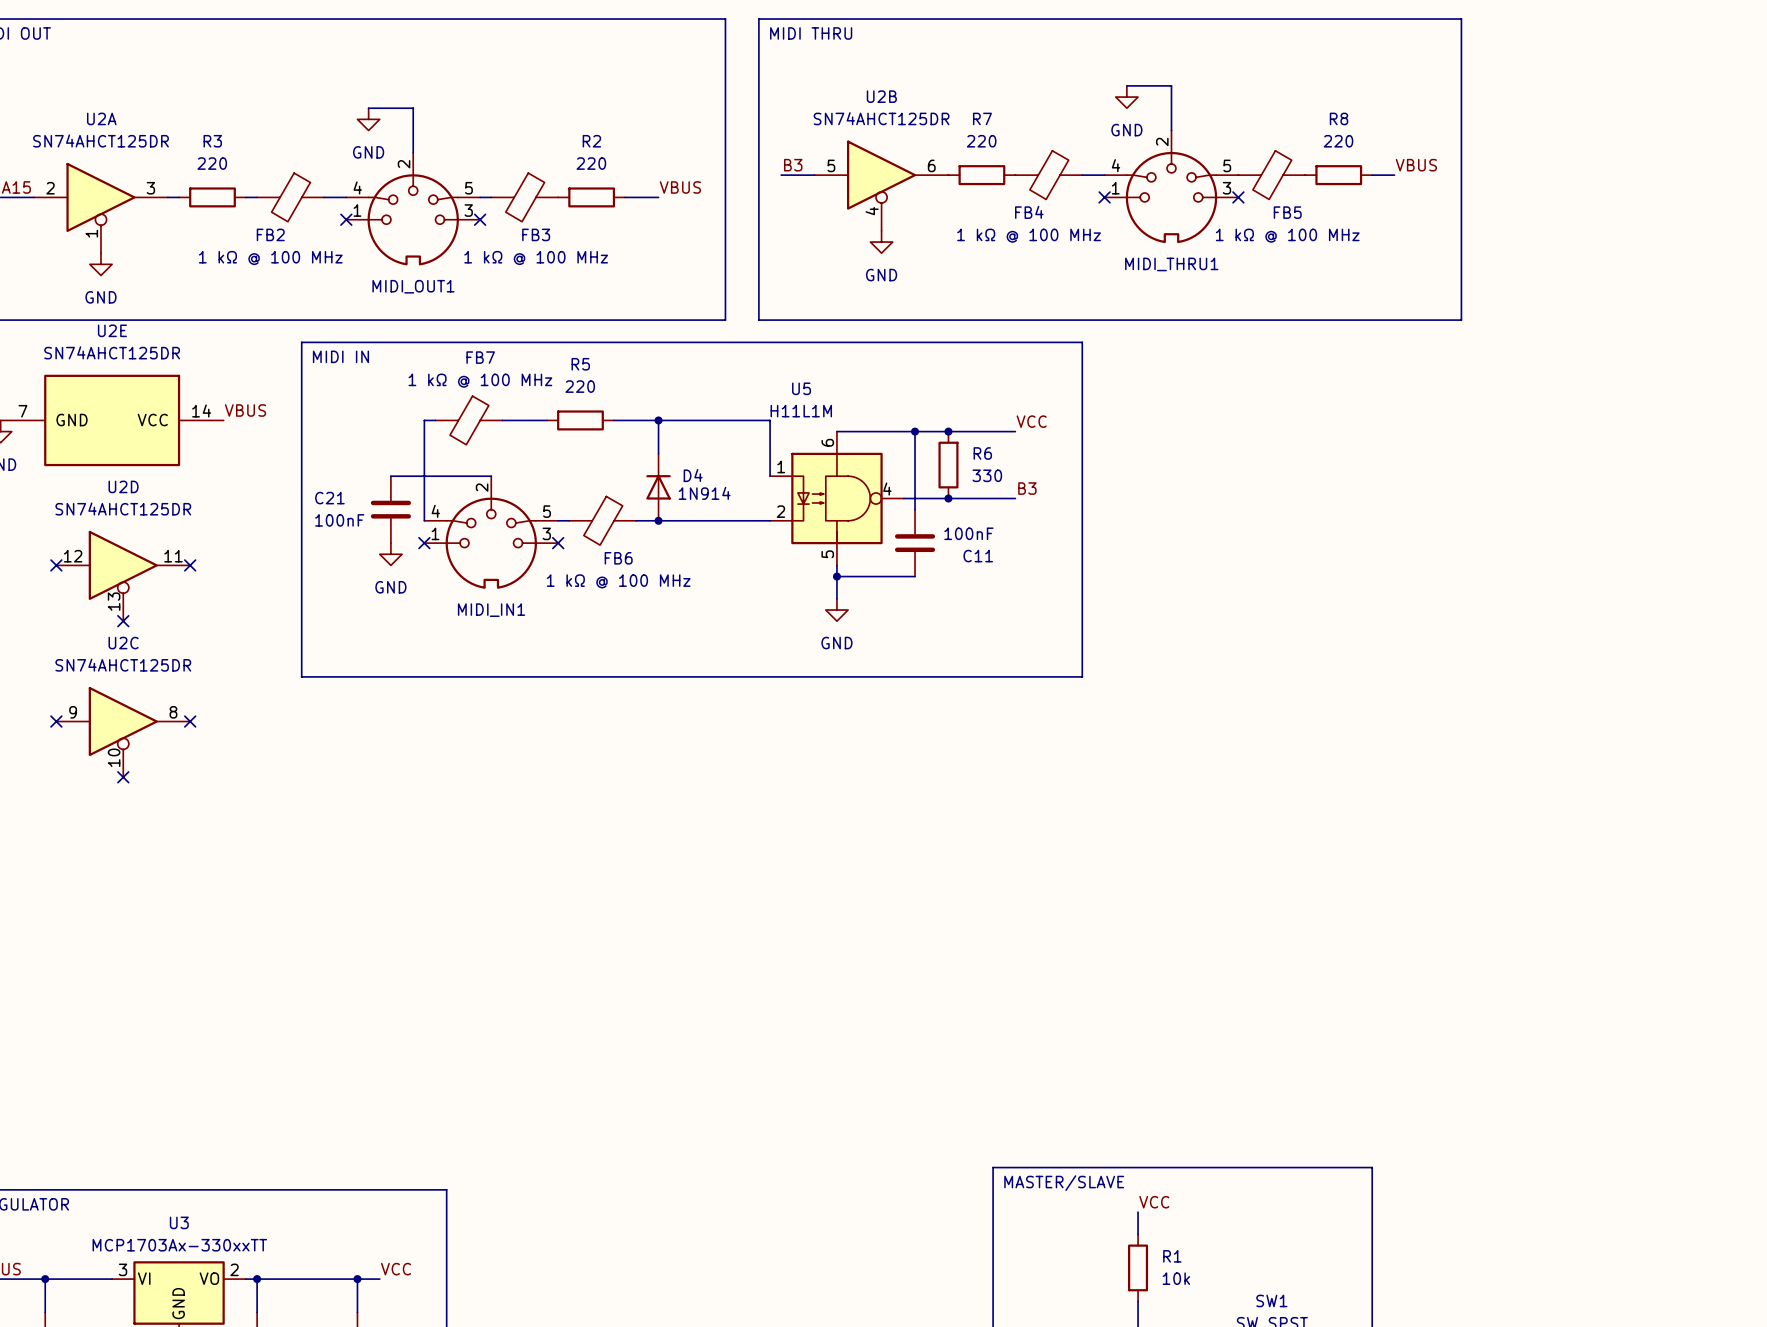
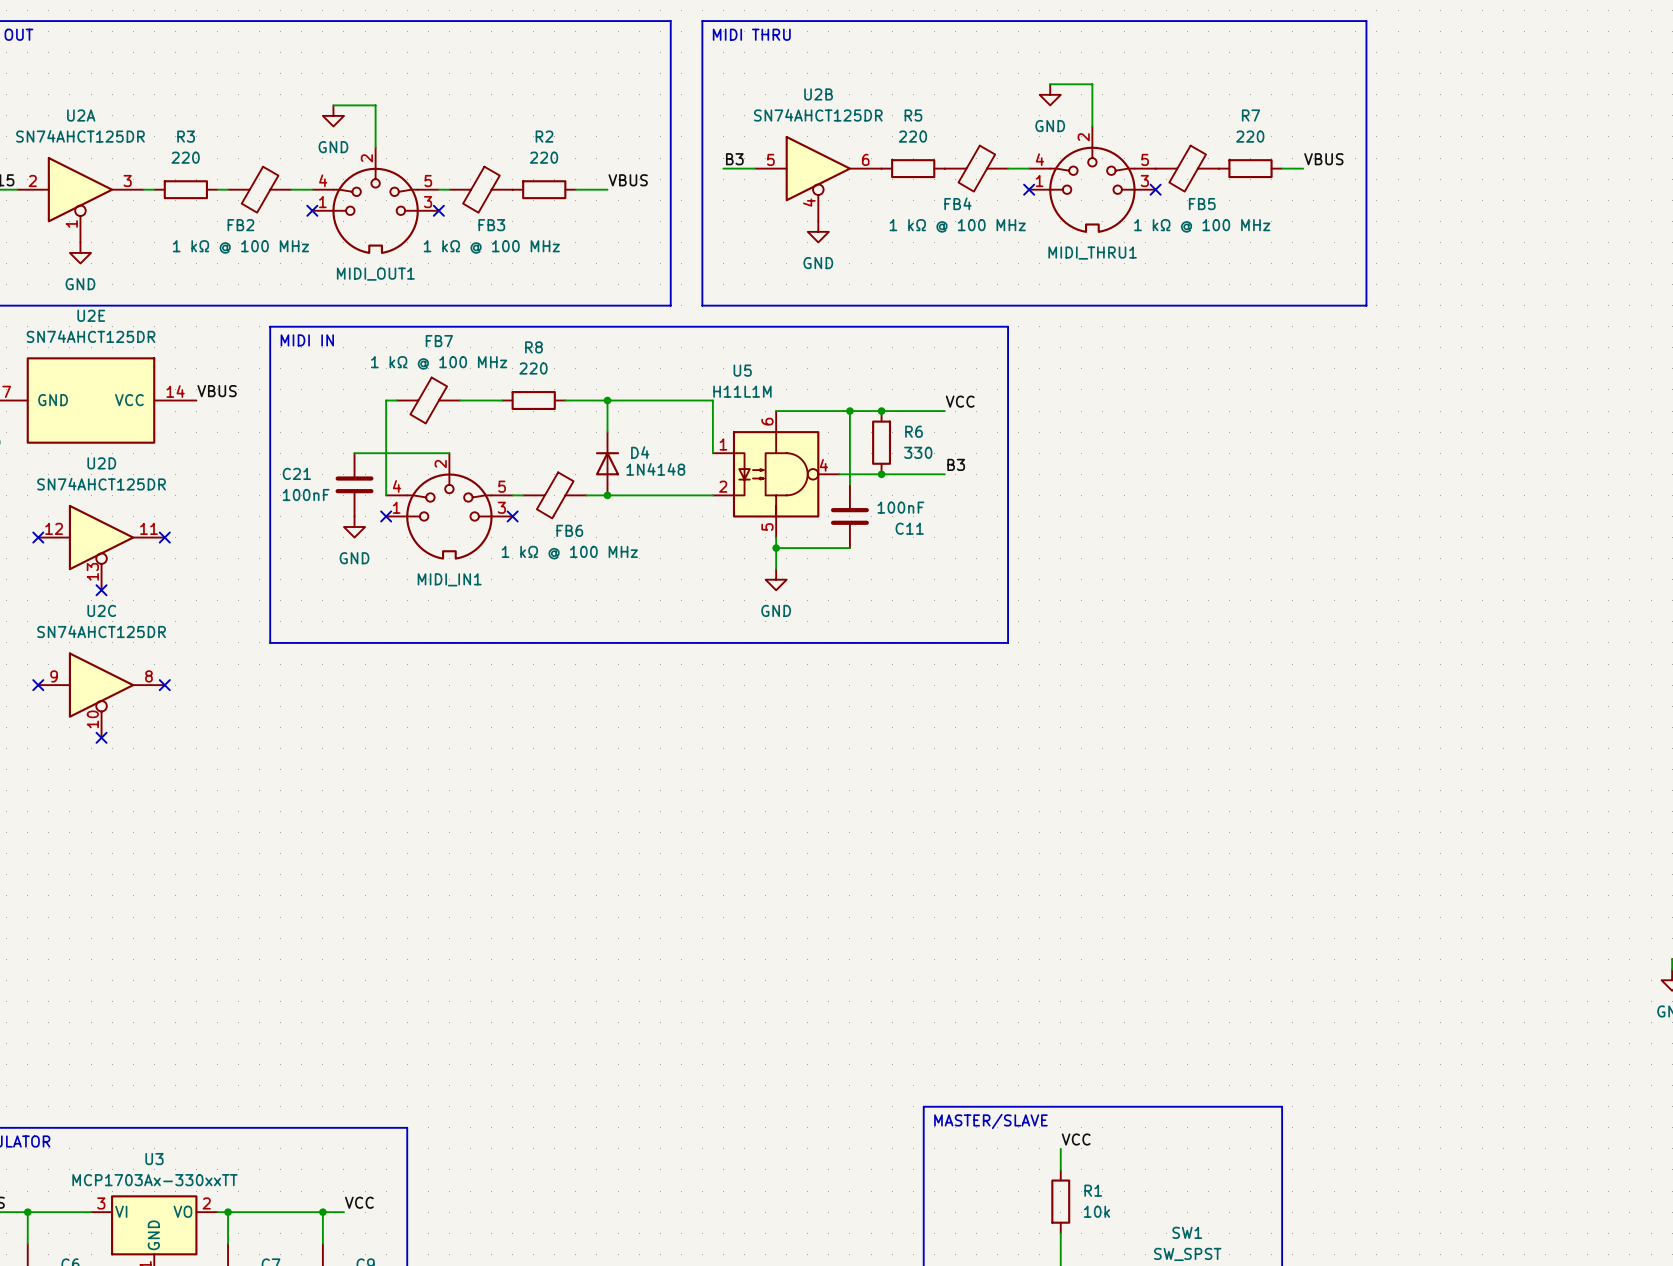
R7 name: R7 (982, 118) -> R5 (913, 115)
R8 name: R8 (1339, 118) -> R7 (1250, 115)
R5 name: R5 (580, 364) -> R8 (533, 347)
D4 value: 1N914 (704, 493) -> 1N4148 (655, 469)

